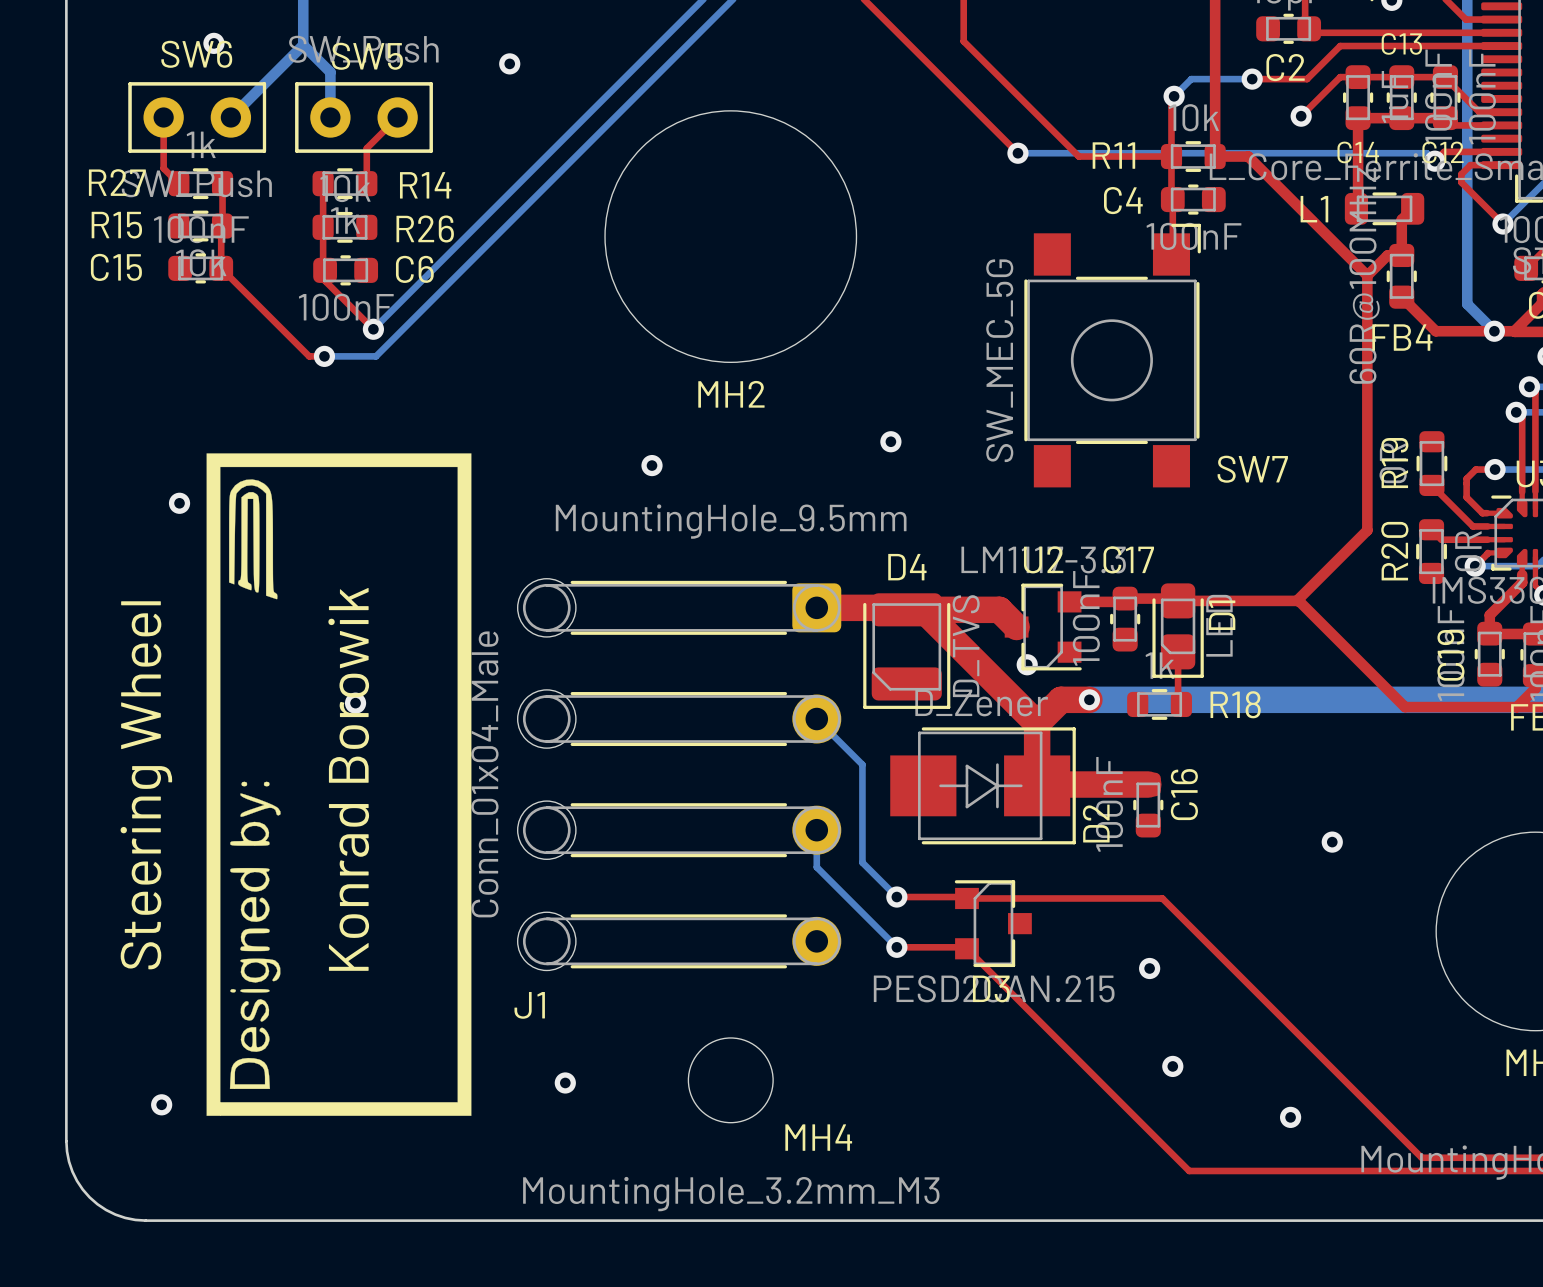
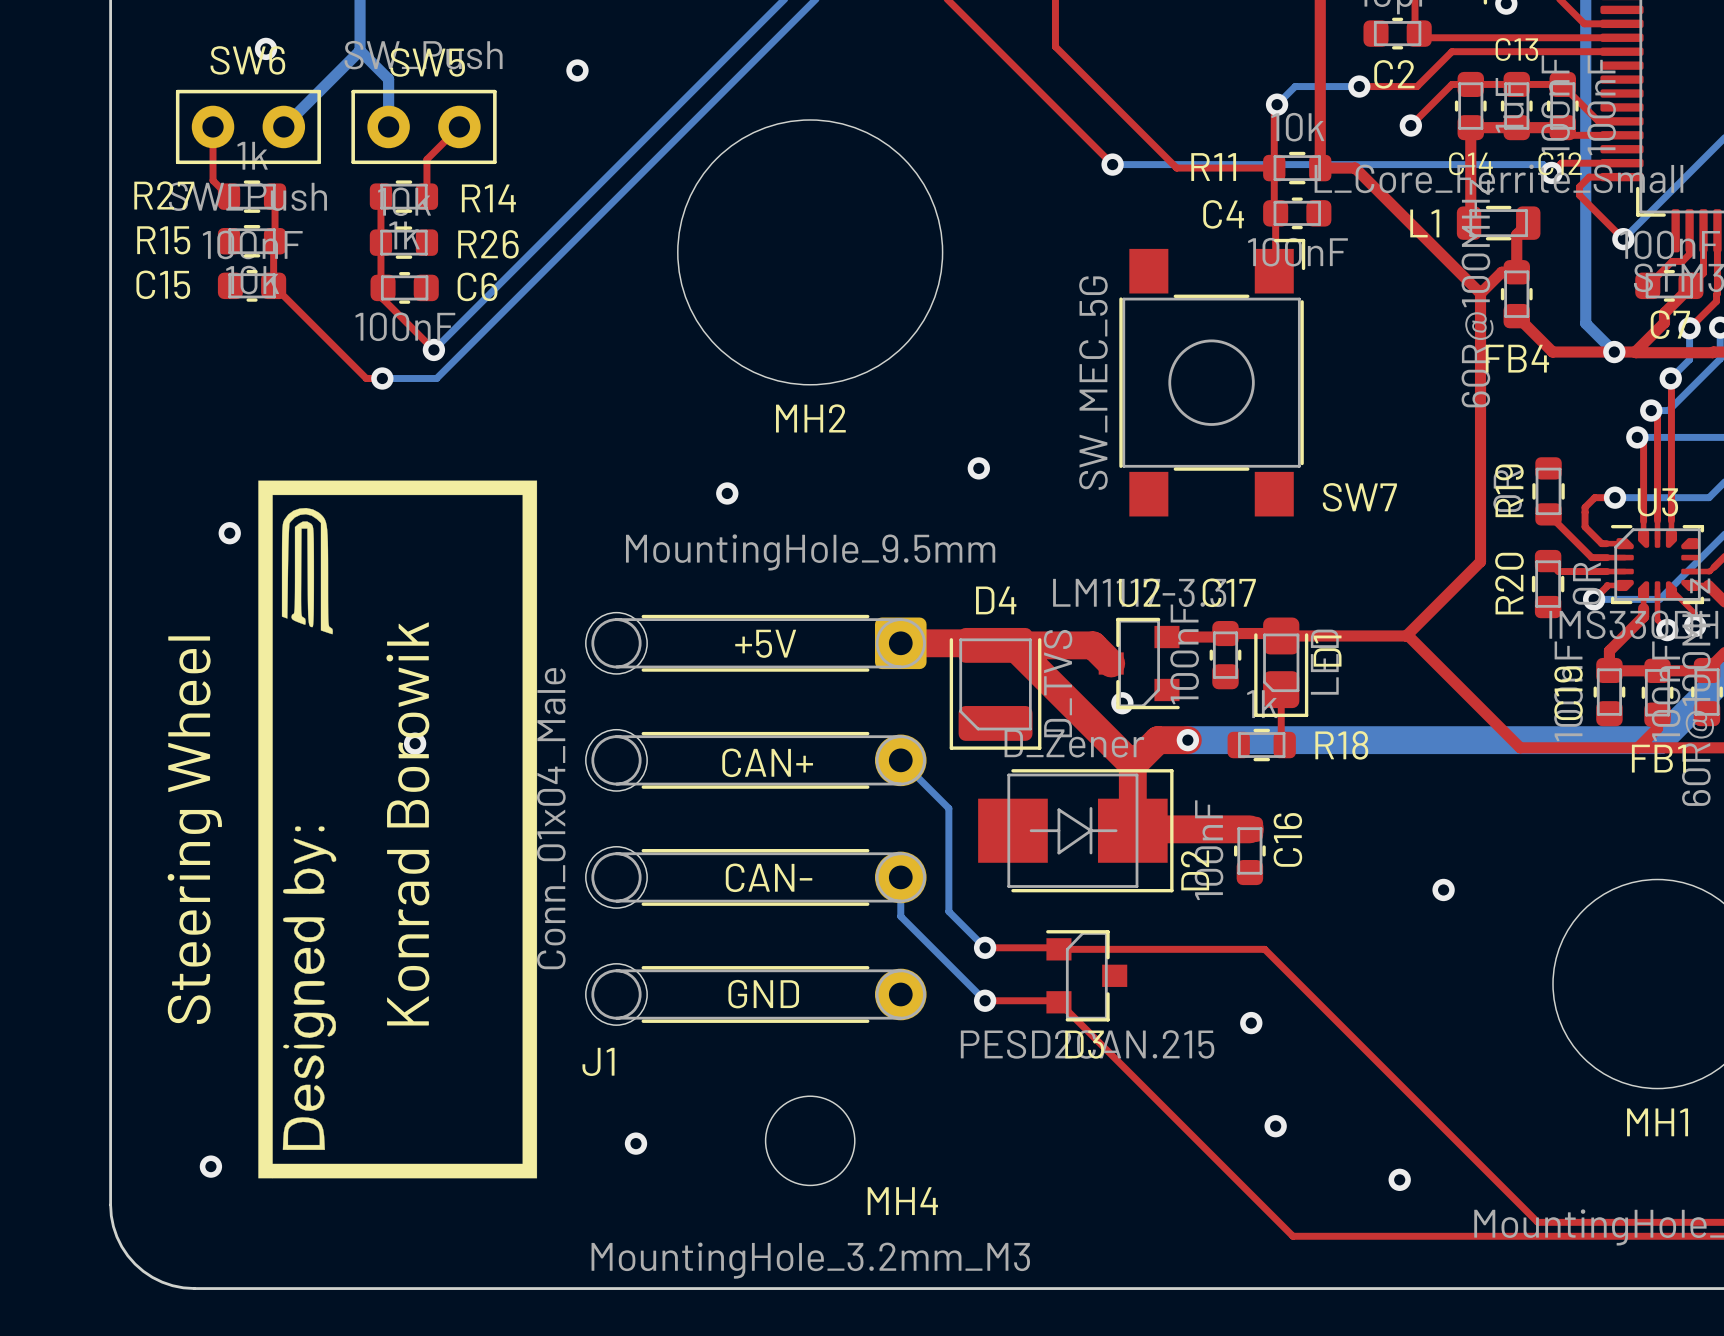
text: none -> +5V (765, 643)
text: none -> CAN+ (767, 762)
text: none -> CAN- (769, 877)
text: none -> GND (763, 994)

